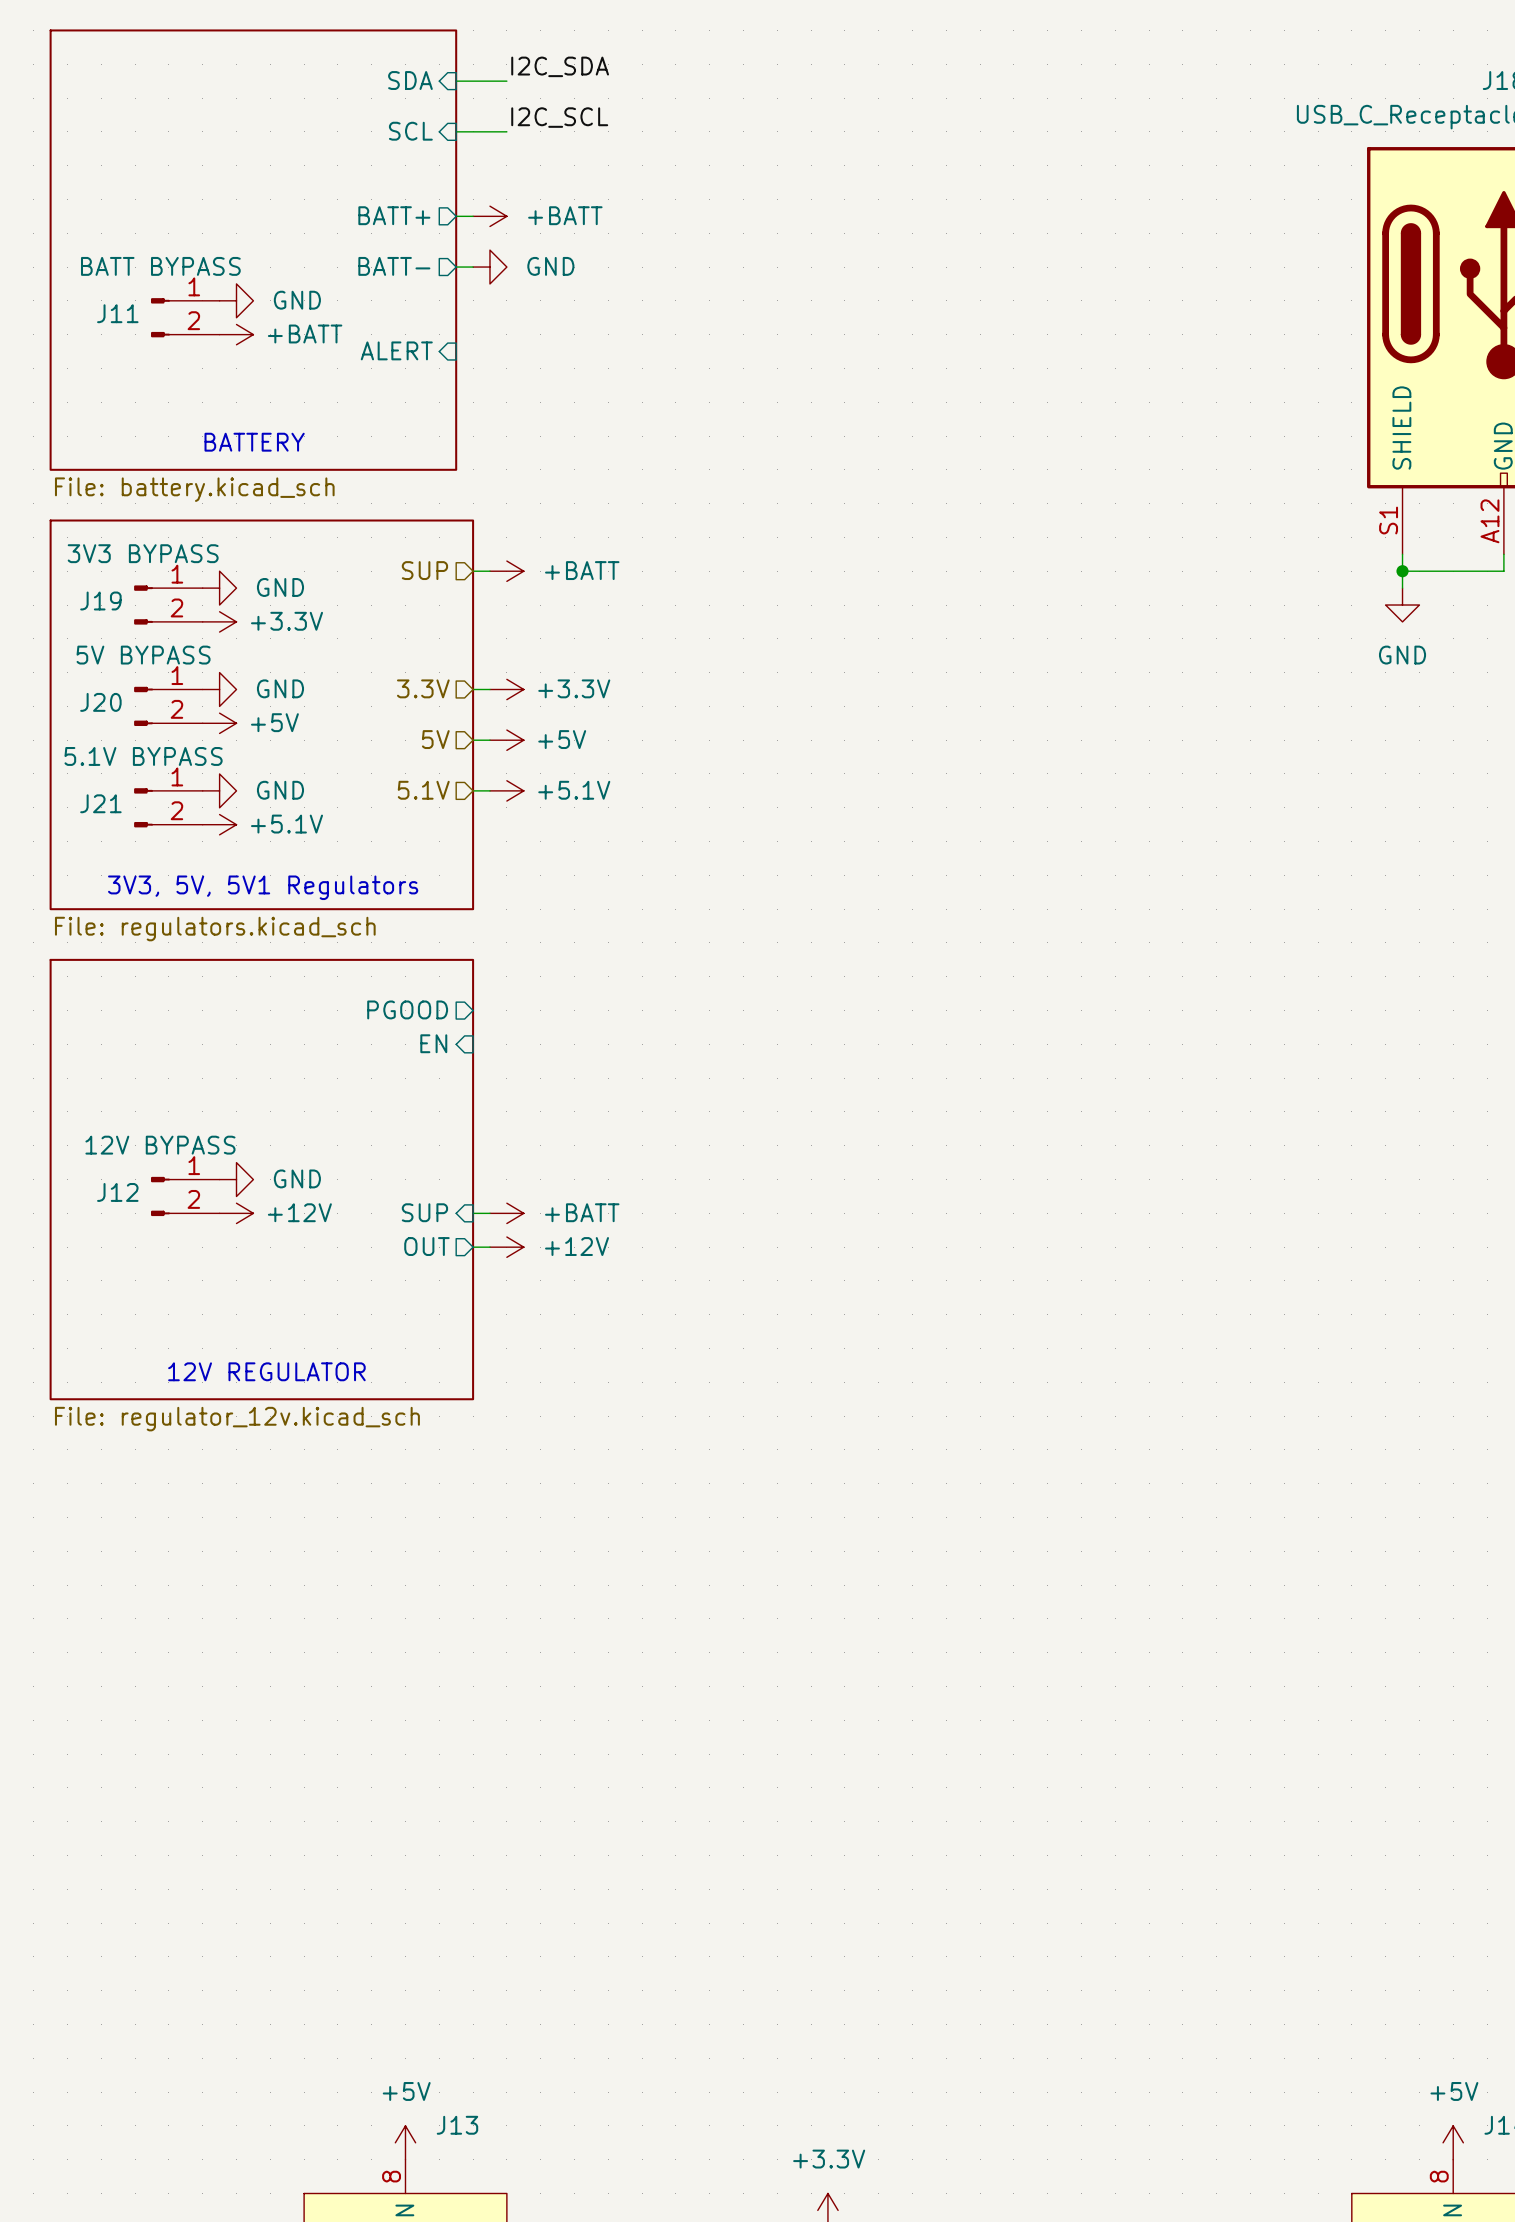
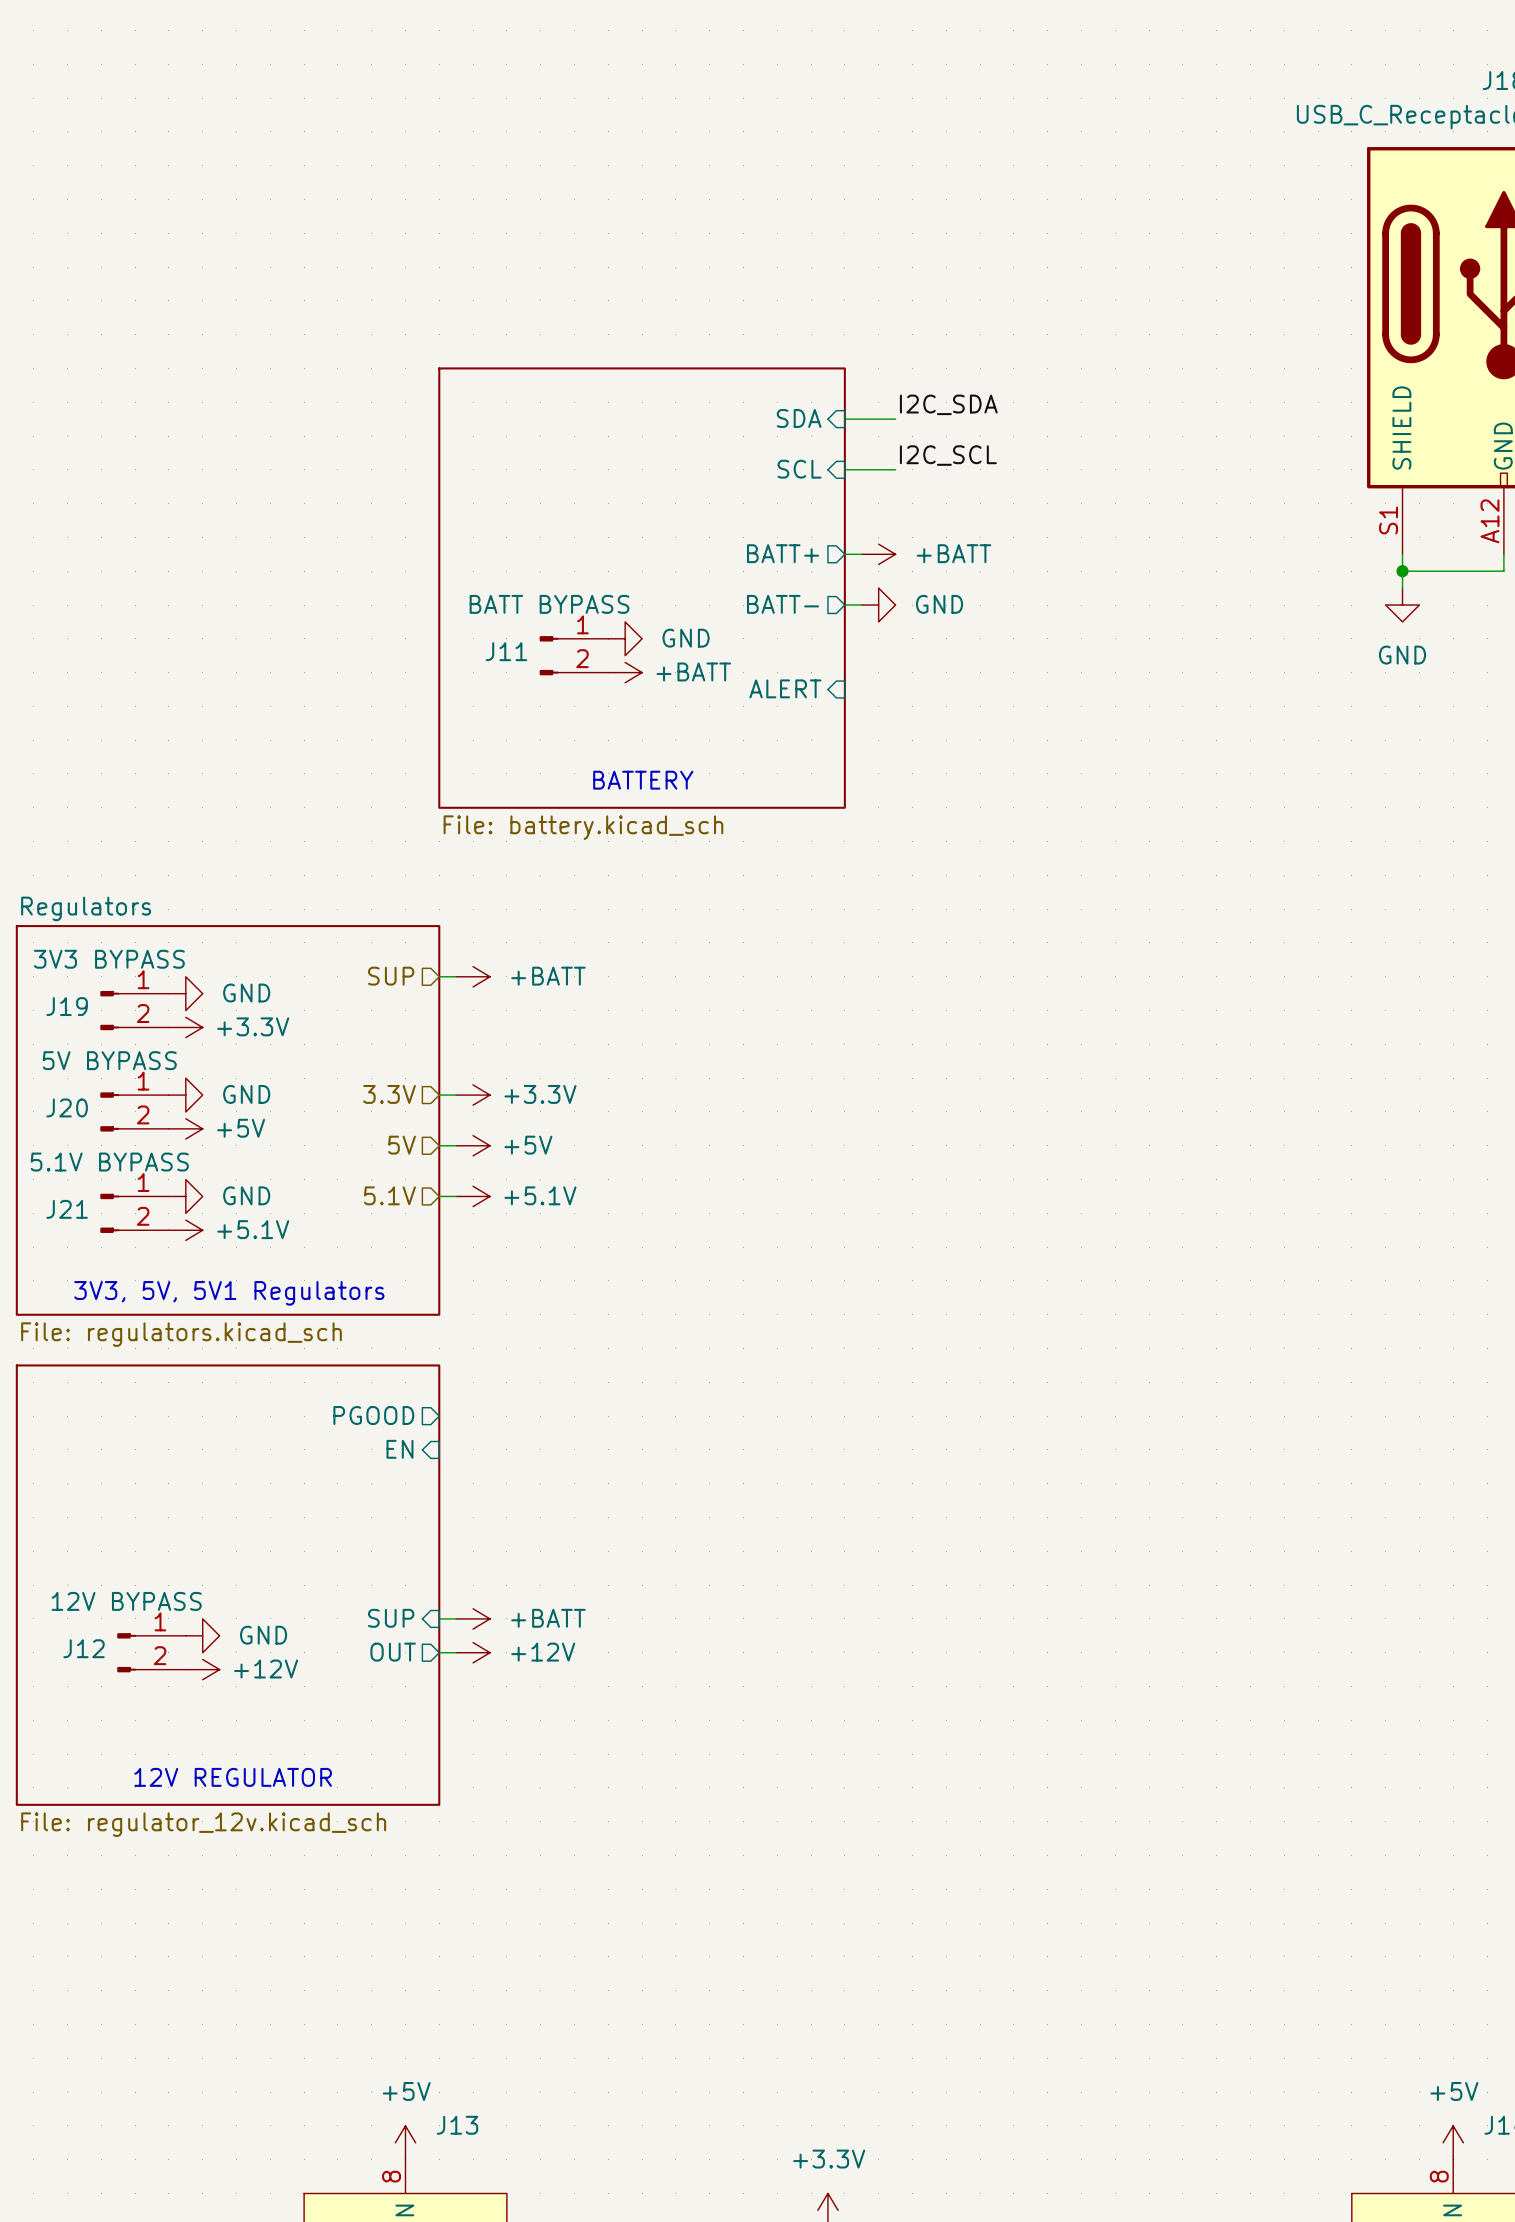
label: I2C_SDA (560, 66) -> none
sheet pin: SDA (410, 80) -> none
wire: (456, 81) (506, 81) -> none
label: I2C_SCL (559, 117) -> none
sheet pin: SCL (410, 131) -> none
wire: (456, 131) (506, 131) -> none
sheet pin: BATT+ (394, 215) -> none
wire: (456, 216) (473, 216) -> none
power symbol: +BATT (489, 216) -> none
sheet: File: battery.kicad_sch (253, 250) -> none
sheet pin: BATT- (394, 266) -> none
wire: (456, 267) (473, 267) -> none
power symbol: GND (489, 267) -> none
power symbol: GND (236, 300) -> none
J11 position: (185, 317) -> (573, 655)
power symbol: +BATT (236, 334) -> none
sheet pin: ALERT (396, 350) -> none
label: none -> I2C_SDA (948, 404)
sheet pin: none -> SDA (799, 418)
wire: none -> (844, 419) (895, 419)
text: BATTERY (254, 442) -> none
label: none -> I2C_SCL (948, 455)
sheet pin: none -> SCL (799, 469)
wire: none -> (844, 469) (895, 469)
sheet pin: none -> BATT+ (783, 553)
wire: none -> (844, 554) (861, 554)
power symbol: none -> +BATT (878, 554)
hierarchical label: SUP (424, 570) -> none
power symbol text position: +BATT (582, 570) -> +BATT (693, 671)
wire: (473, 571) (489, 571) -> none
power symbol position: +BATT (506, 571) -> +BATT (625, 672)
power symbol: GND (219, 588) -> none
sheet: none -> File: battery.kicad_sch (642, 588)
sheet pin: none -> BATT- (783, 604)
J19 position: (168, 605) -> (134, 1010)
wire: none -> (844, 605) (861, 605)
power symbol: none -> GND (878, 605)
power symbol: +3.3V (219, 621) -> none
power symbol: none -> GND (625, 638)
hierarchical label: 3.3V (423, 688) -> none
sheet pin: none -> ALERT (785, 688)
power symbol: GND (219, 689) -> none
wire: (473, 689) (489, 689) -> none
power symbol: +3.3V (506, 689) -> none
J20 position: (168, 706) -> (134, 1111)
sheet: File: regulators.kicad_sch (261, 714) -> none
power symbol: +5V (219, 723) -> none
hierarchical label: 5V (435, 739) -> none
wire: (473, 740) (489, 740) -> none
power symbol: +5V (506, 740) -> none
text: none -> BATTERY (643, 780)
power symbol: GND (219, 790) -> none
hierarchical label: 5.1V (423, 790) -> none
wire: (473, 790) (489, 790) -> (439, 976) (456, 976)
power symbol: +5.1V (506, 790) -> none
J21 position: (168, 807) -> (134, 1213)
power symbol: +5.1V (219, 824) -> none
text: 3V3, 5V, 5V1 Regulators (263, 887) -> none
hierarchical label: none -> SUP (391, 976)
power symbol: none -> +BATT (473, 976)
power symbol: none -> GND (185, 993)
sheet pin: PGOOD (407, 1009) -> none
power symbol: none -> +3.3V (185, 1027)
sheet pin: EN (433, 1043) -> none
hierarchical label: none -> 3.3V (389, 1094)
power symbol: none -> GND (185, 1095)
wire: none -> (439, 1095) (456, 1095)
power symbol: none -> +3.3V (473, 1095)
sheet Regulators: none -> File: regulators.kicad_sch (228, 1120)
power symbol: none -> +5V (185, 1128)
hierarchical label: none -> 5V (402, 1145)
power symbol: none -> +5V (473, 1145)
power symbol: GND (236, 1179) -> none
sheet: File: regulator_12v.kicad_sch (261, 1179) -> none
hierarchical label: none -> 5.1V (389, 1195)
power symbol: none -> GND (185, 1196)
J12 position: (185, 1196) -> (151, 1652)
power symbol: none -> +5.1V (473, 1196)
sheet pin: SUP (424, 1212) -> none
power symbol: +12V (236, 1213) -> none
wire: (473, 1213) (489, 1213) -> (439, 1196) (456, 1196)
power symbol: +BATT (506, 1213) -> none
power symbol: none -> +5.1V (185, 1230)
sheet pin: OUT (426, 1246) -> none
wire: (473, 1247) (489, 1247) -> (439, 1145) (456, 1145)
power symbol: +12V (506, 1247) -> none
text: none -> 3V3, 5V, 5V1 Regulators (229, 1293)
text: 12V REGULATOR (266, 1371) -> none
sheet pin: none -> PGOOD (373, 1415)
sheet pin: none -> EN (399, 1449)
sheet: none -> File: regulator_12v.kicad_sch (228, 1585)
sheet pin: none -> SUP (391, 1618)
wire: none -> (439, 1618) (456, 1618)
power symbol: none -> +BATT (473, 1618)
power symbol: none -> GND (202, 1635)
sheet pin: none -> OUT (393, 1652)
wire: none -> (439, 1652) (456, 1652)
power symbol: none -> +12V (473, 1652)
power symbol: none -> +12V (202, 1669)
text: none -> 12V REGULATOR (233, 1777)

